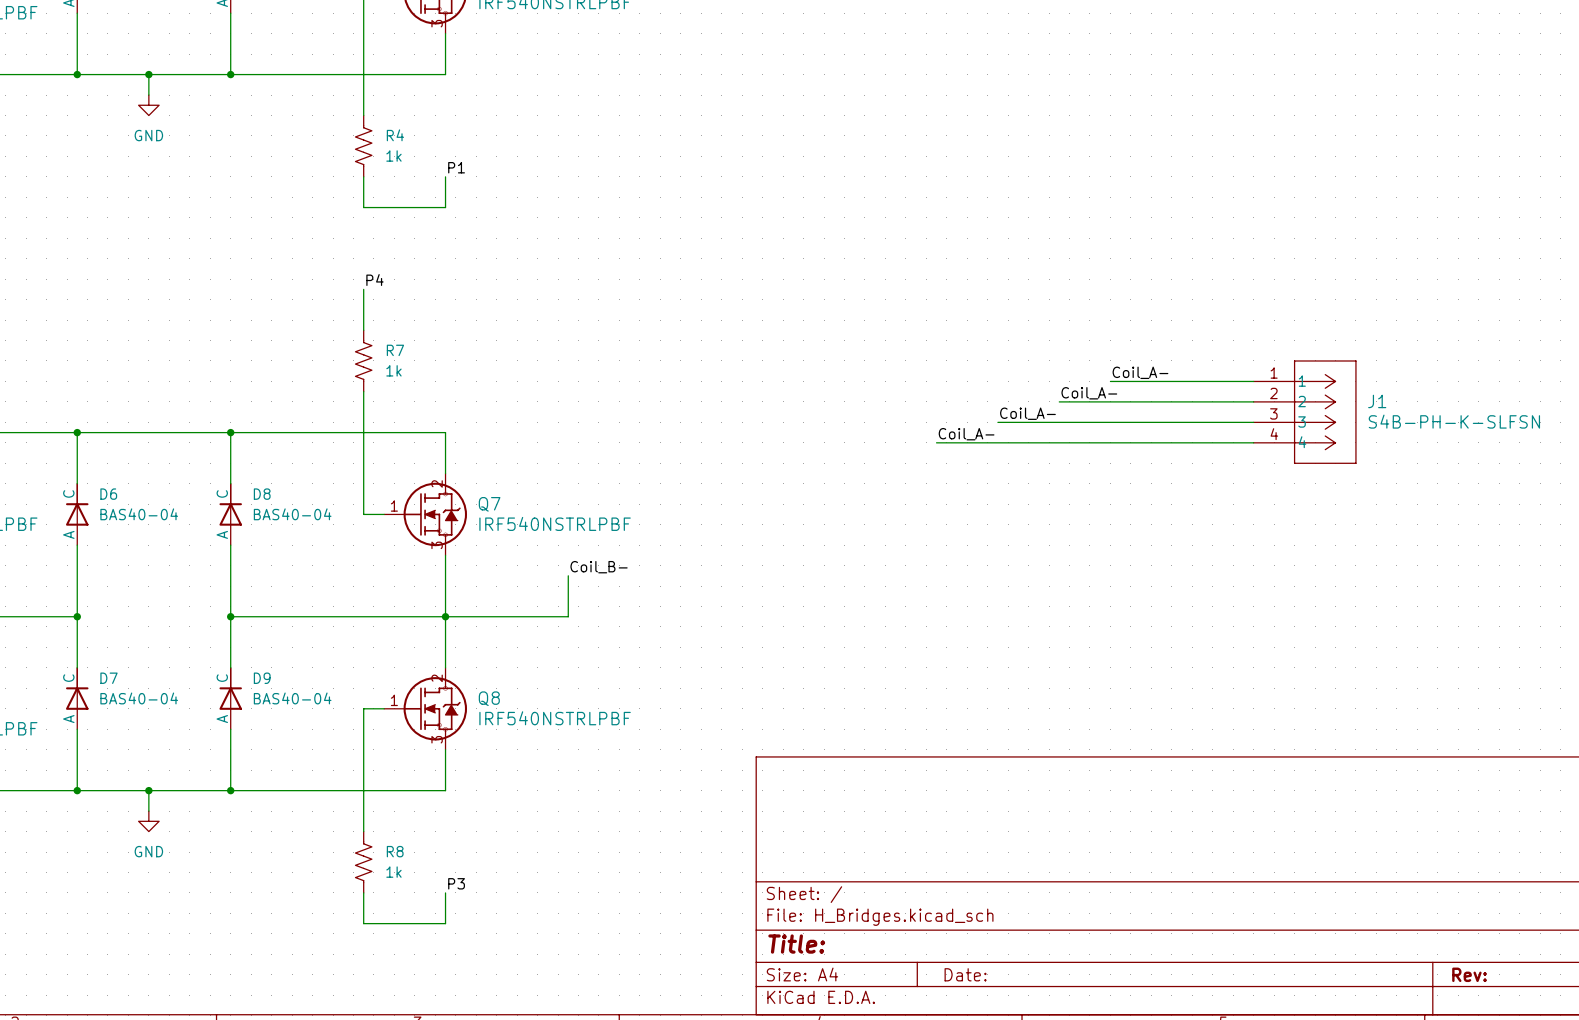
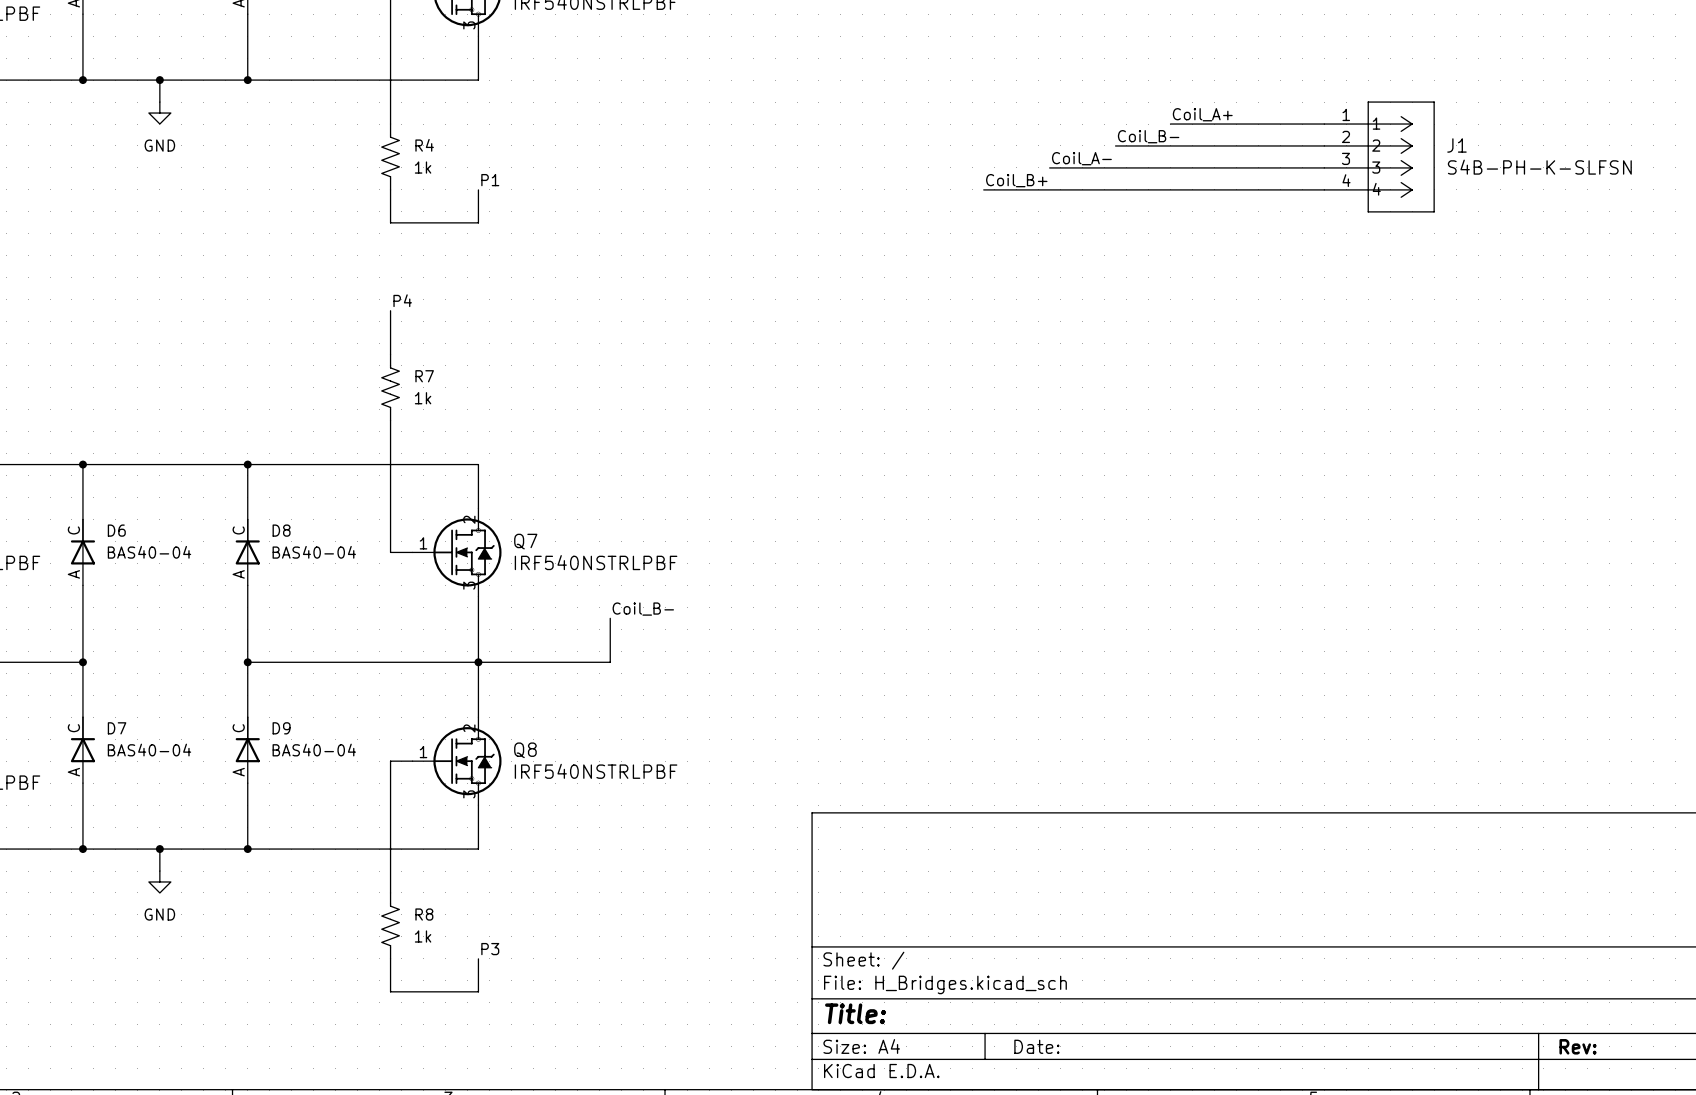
label: none -> Coil_A+ (1202, 114)
wire: none -> (1170, 124) (1324, 124)
label: none -> Coil_B- (1148, 136)
wire: none -> (1115, 145) (1324, 145)
label: none -> Coil_A- (1081, 158)
wire: none -> (1049, 167) (1324, 167)
label: none -> Coil_B+ (1016, 180)
wire: none -> (983, 189) (1324, 189)
label: Coil_A- (1140, 372) -> none
wire: (1110, 381) (1253, 381) -> none
label: Coil_A- (1089, 393) -> none
wire: (1059, 401) (1253, 401) -> none
J1 position: (1305, 412) -> (1379, 156)
label: Coil_A- (1027, 413) -> none
wire: (997, 422) (1253, 422) -> none
label: Coil_A- (966, 434) -> none
wire: (936, 442) (1253, 442) -> none

